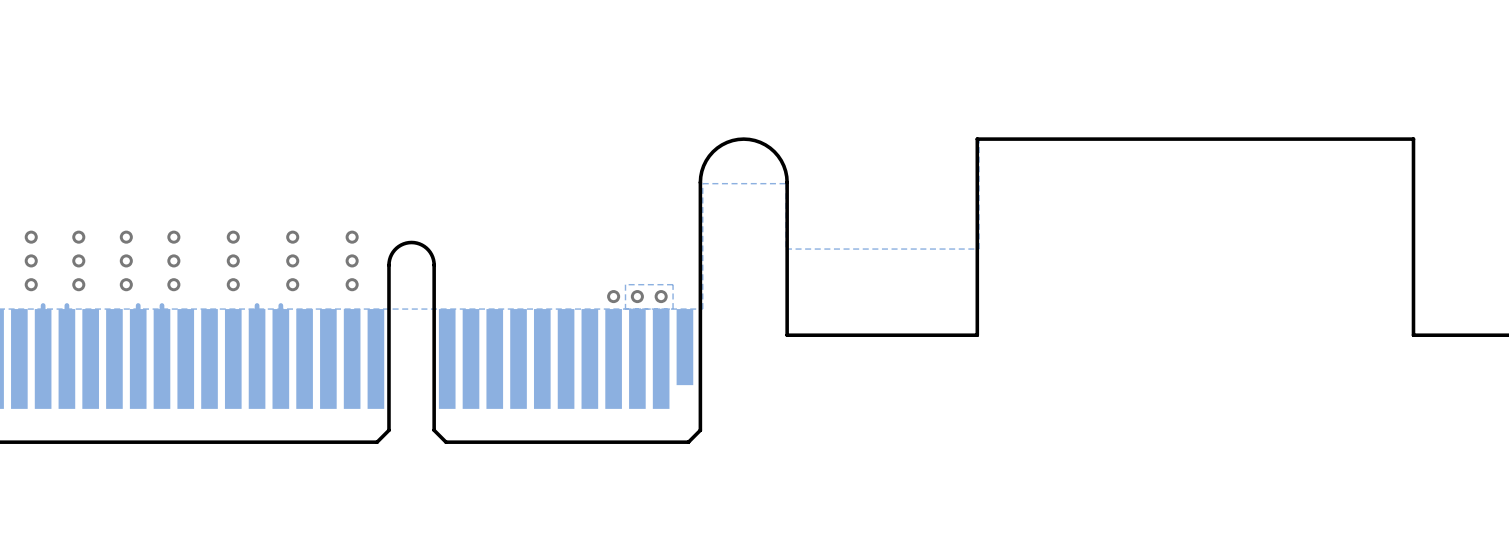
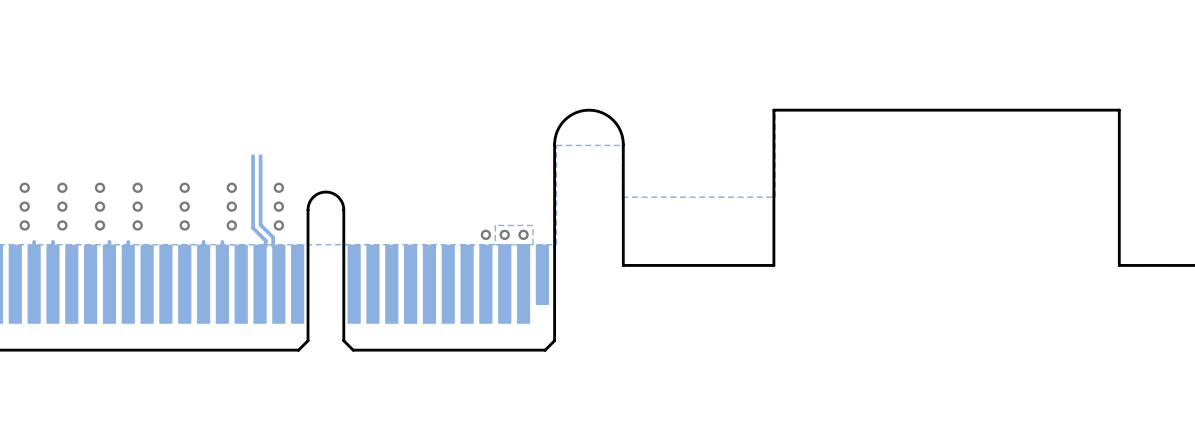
track: none -> (253, 156) (253, 228) (265, 240) (265, 245) (260, 251) (260, 284)
track: none -> (260, 156) (260, 224) (273, 237) (273, 245) (278, 251) (278, 284)

